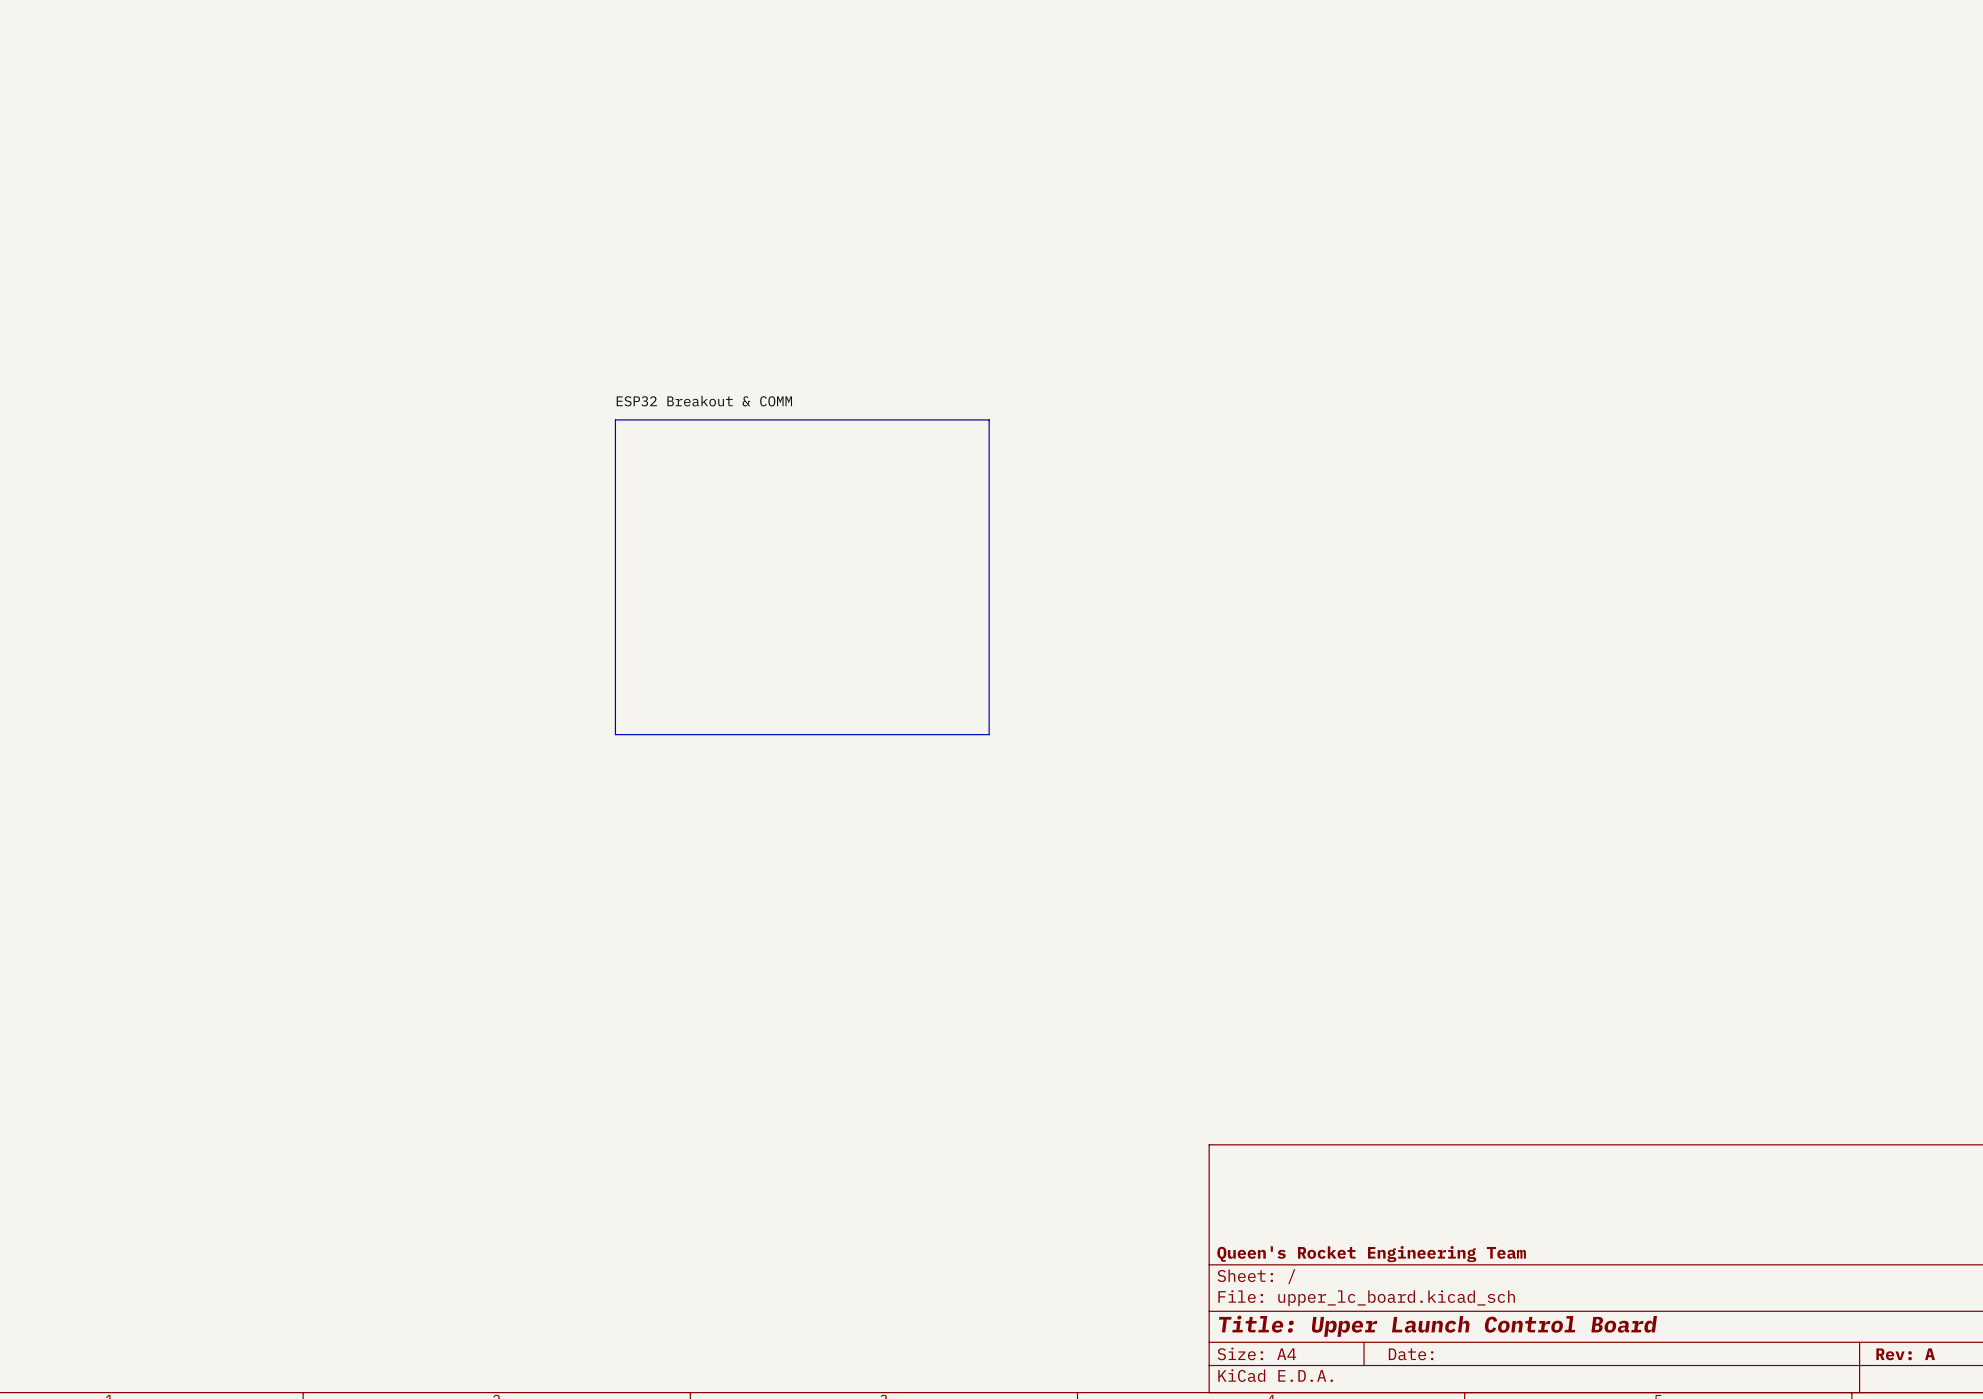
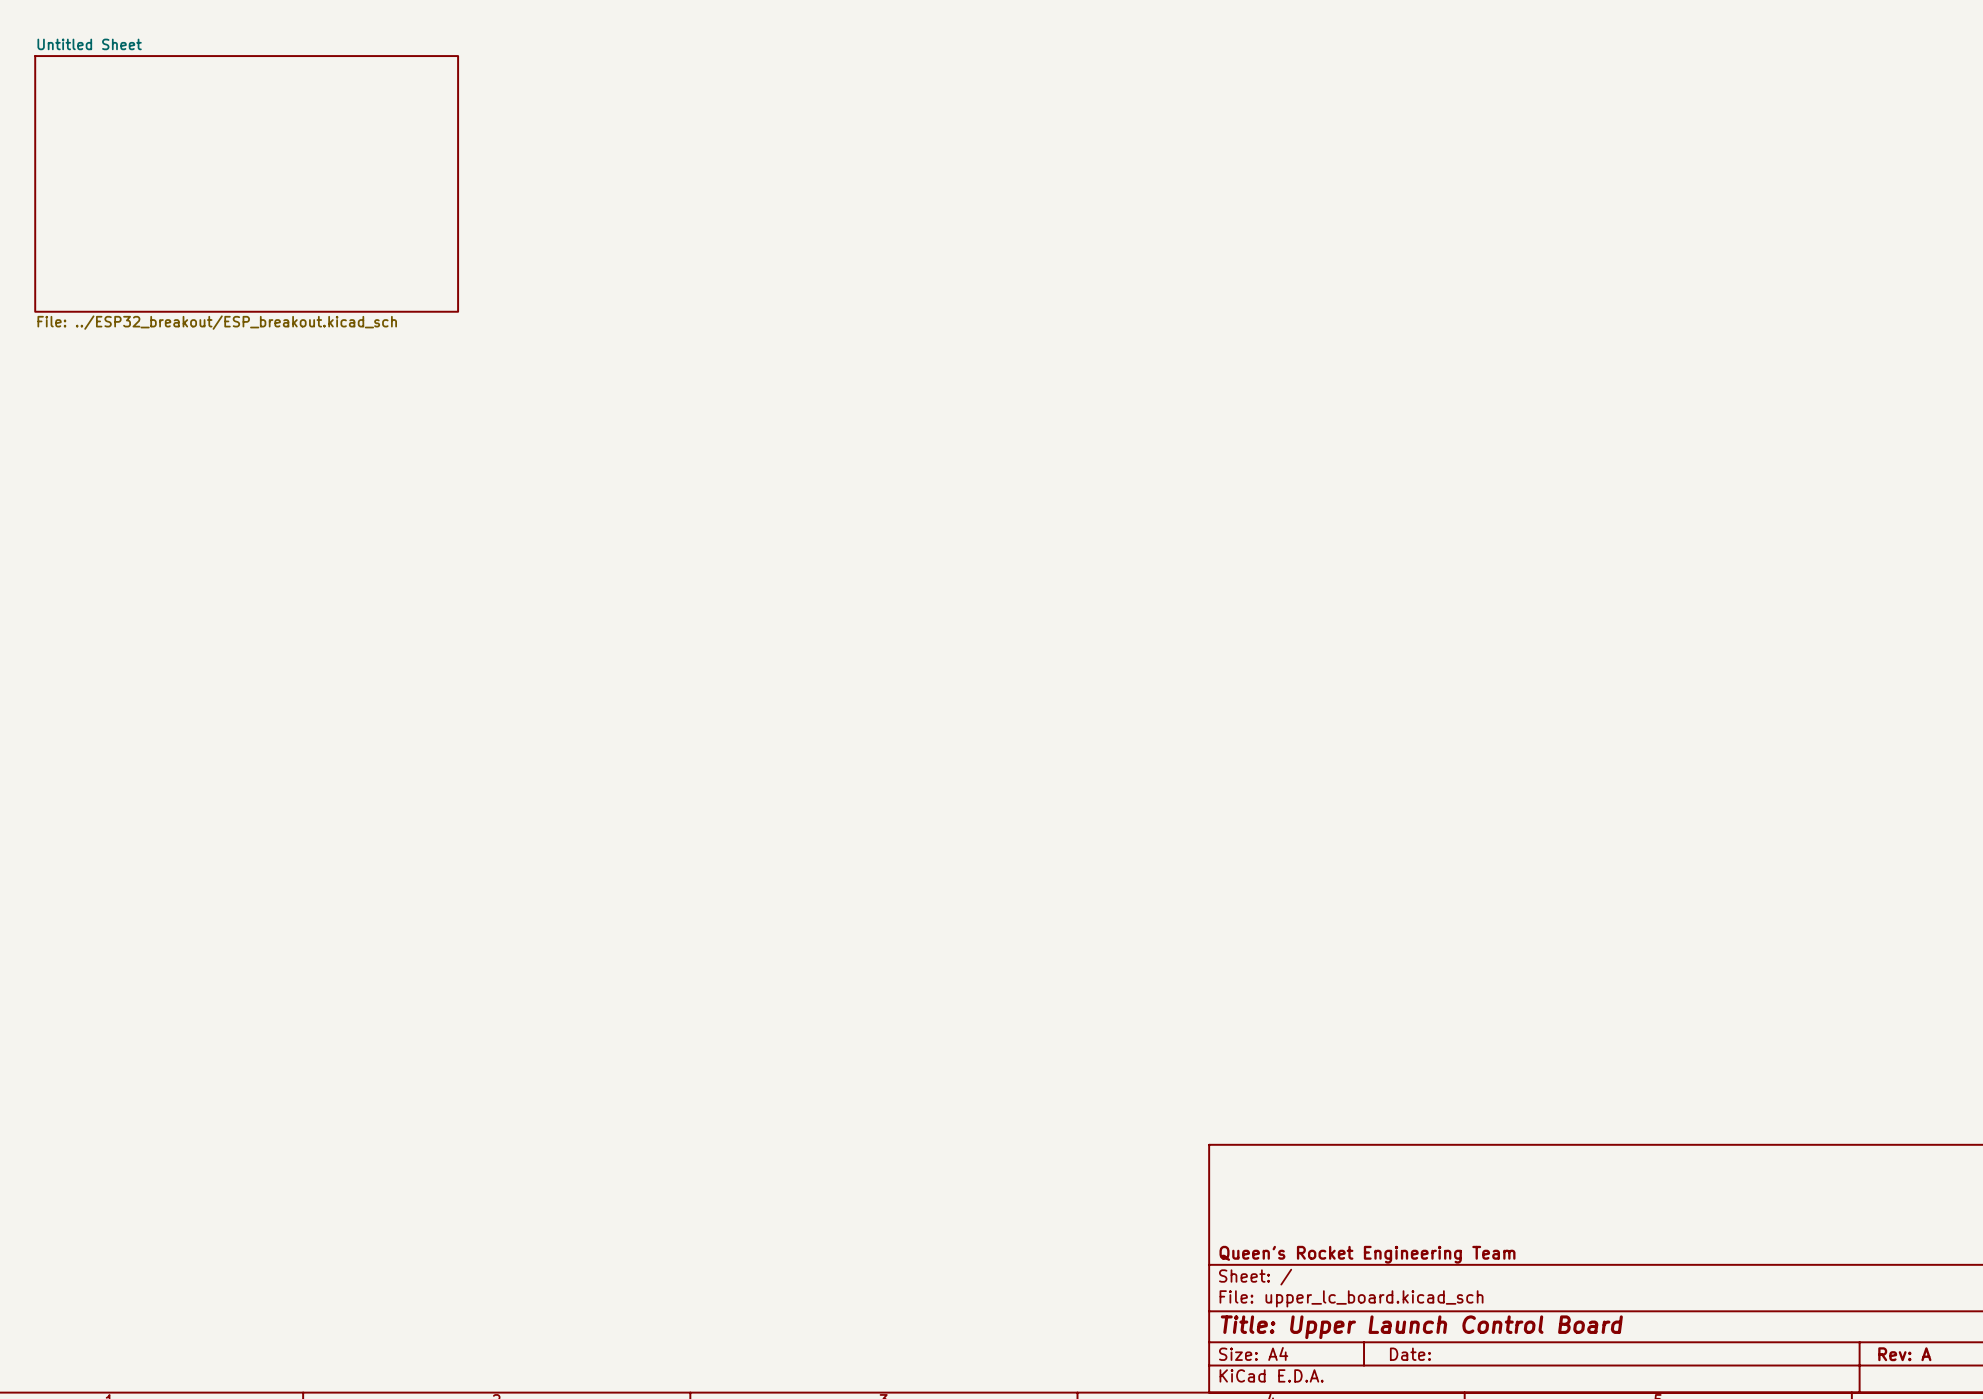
sheet Untitled Sheet: none -> File: ../ESP32_breakout/ESP_breakout.kicad_sch (246, 183)
label: ESP32 Breakout & COMM (704, 401) -> none
line: (615, 419) (989, 419) (989, 734) (615, 734) (615, 419) -> none

